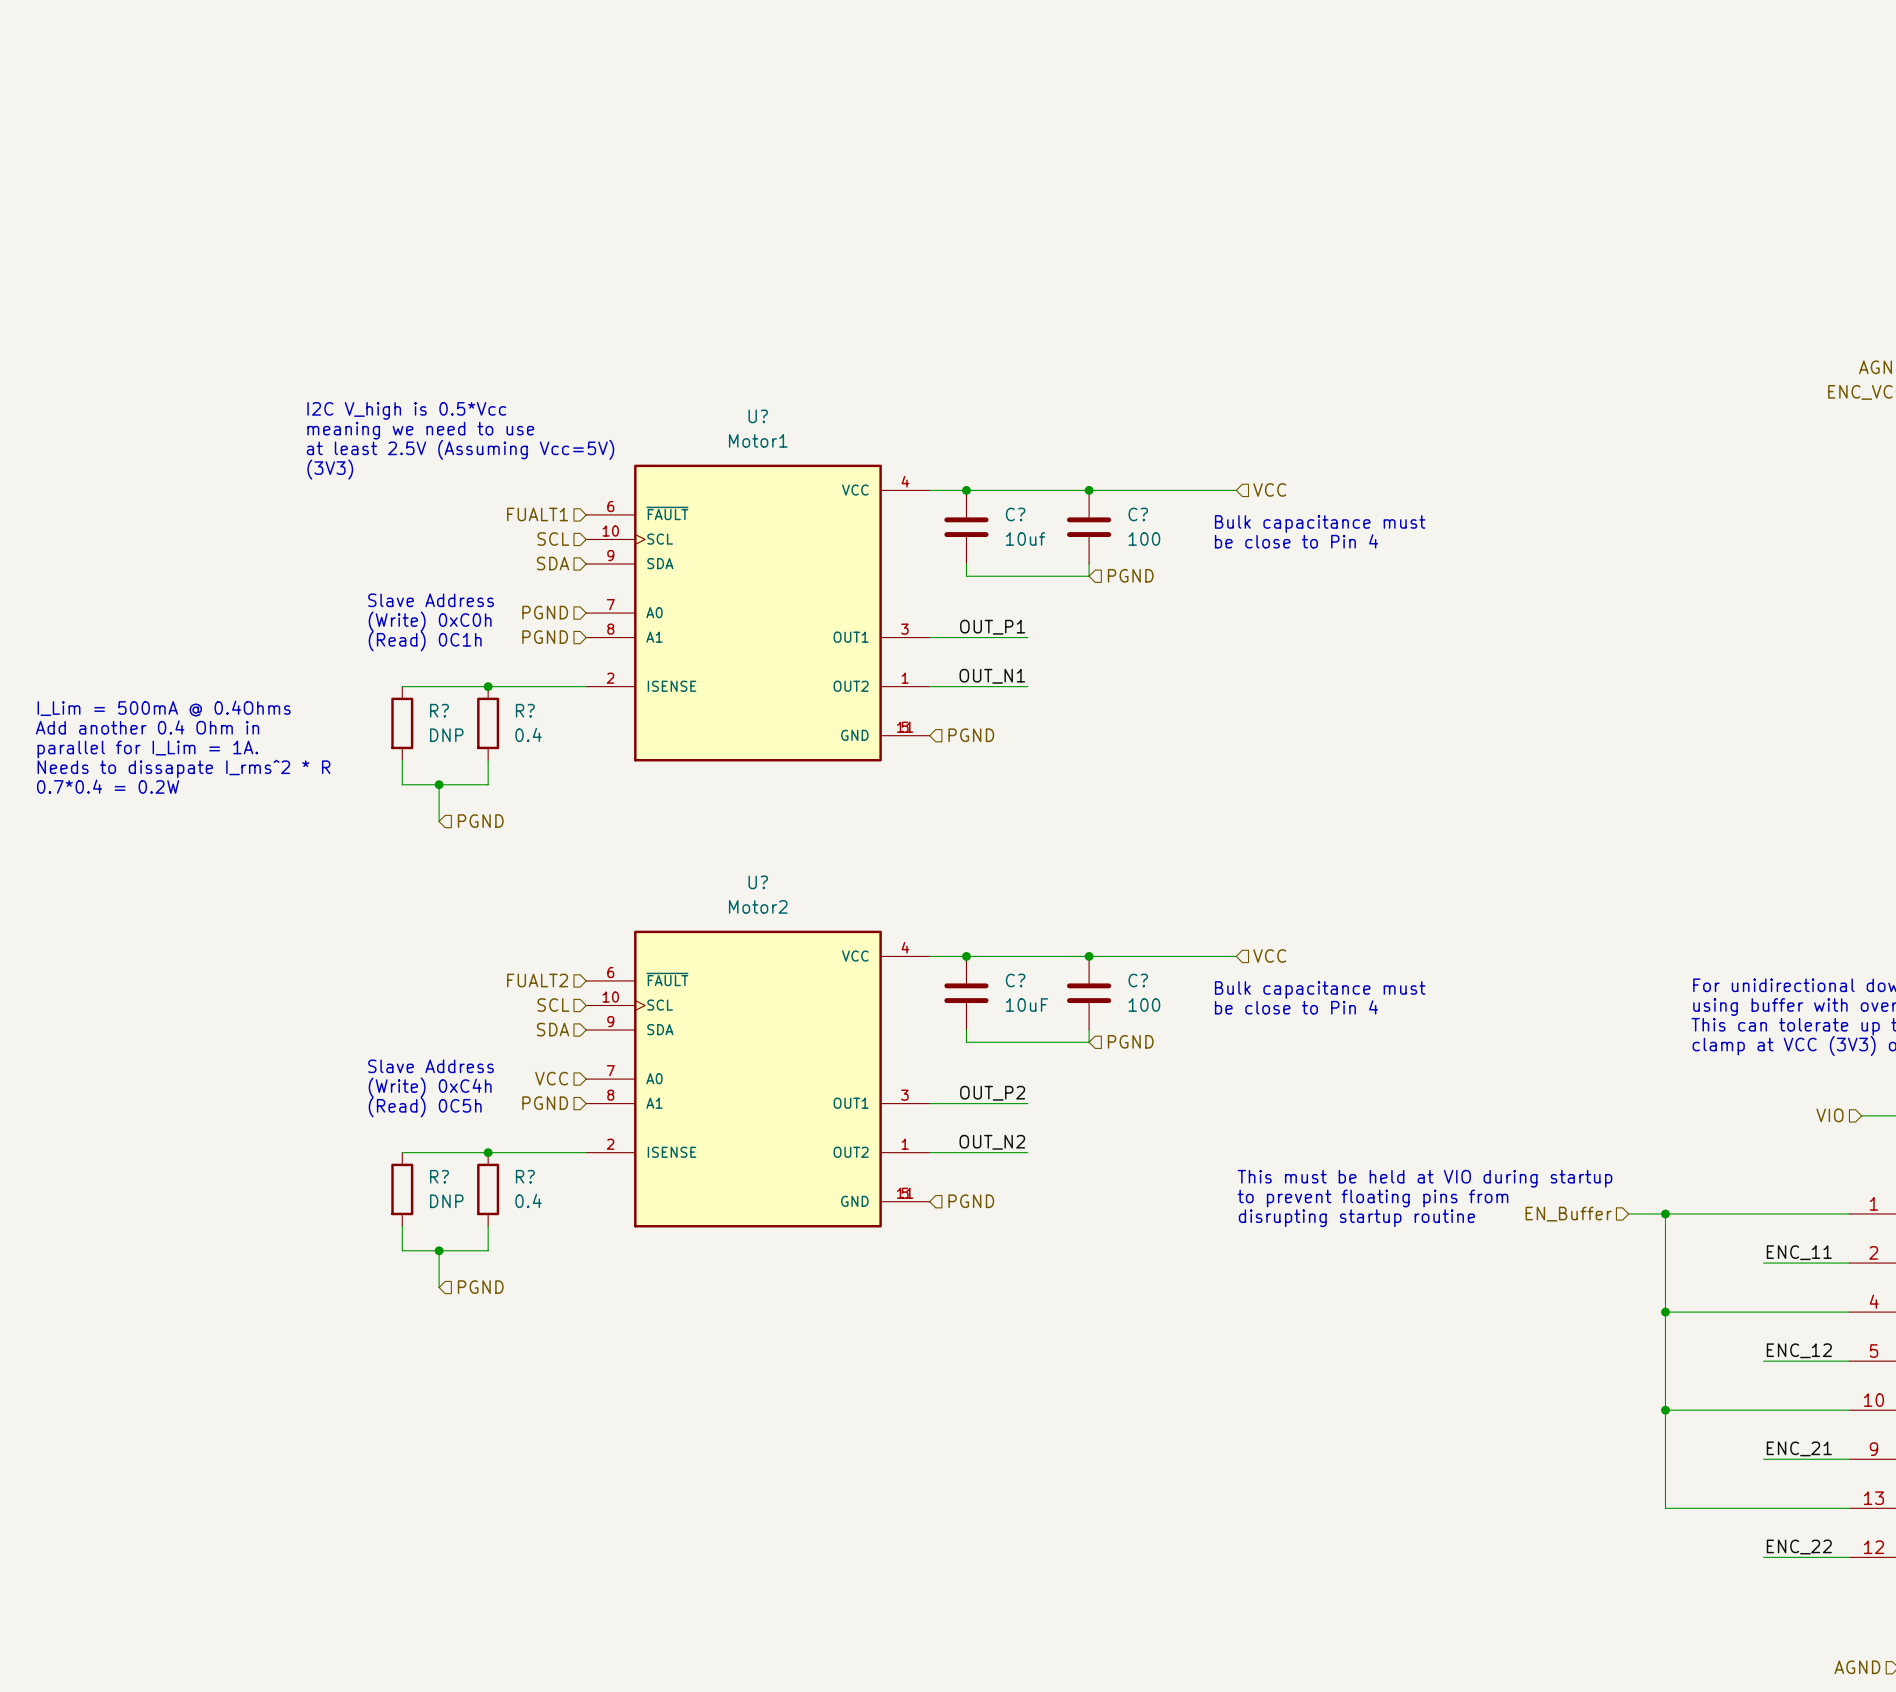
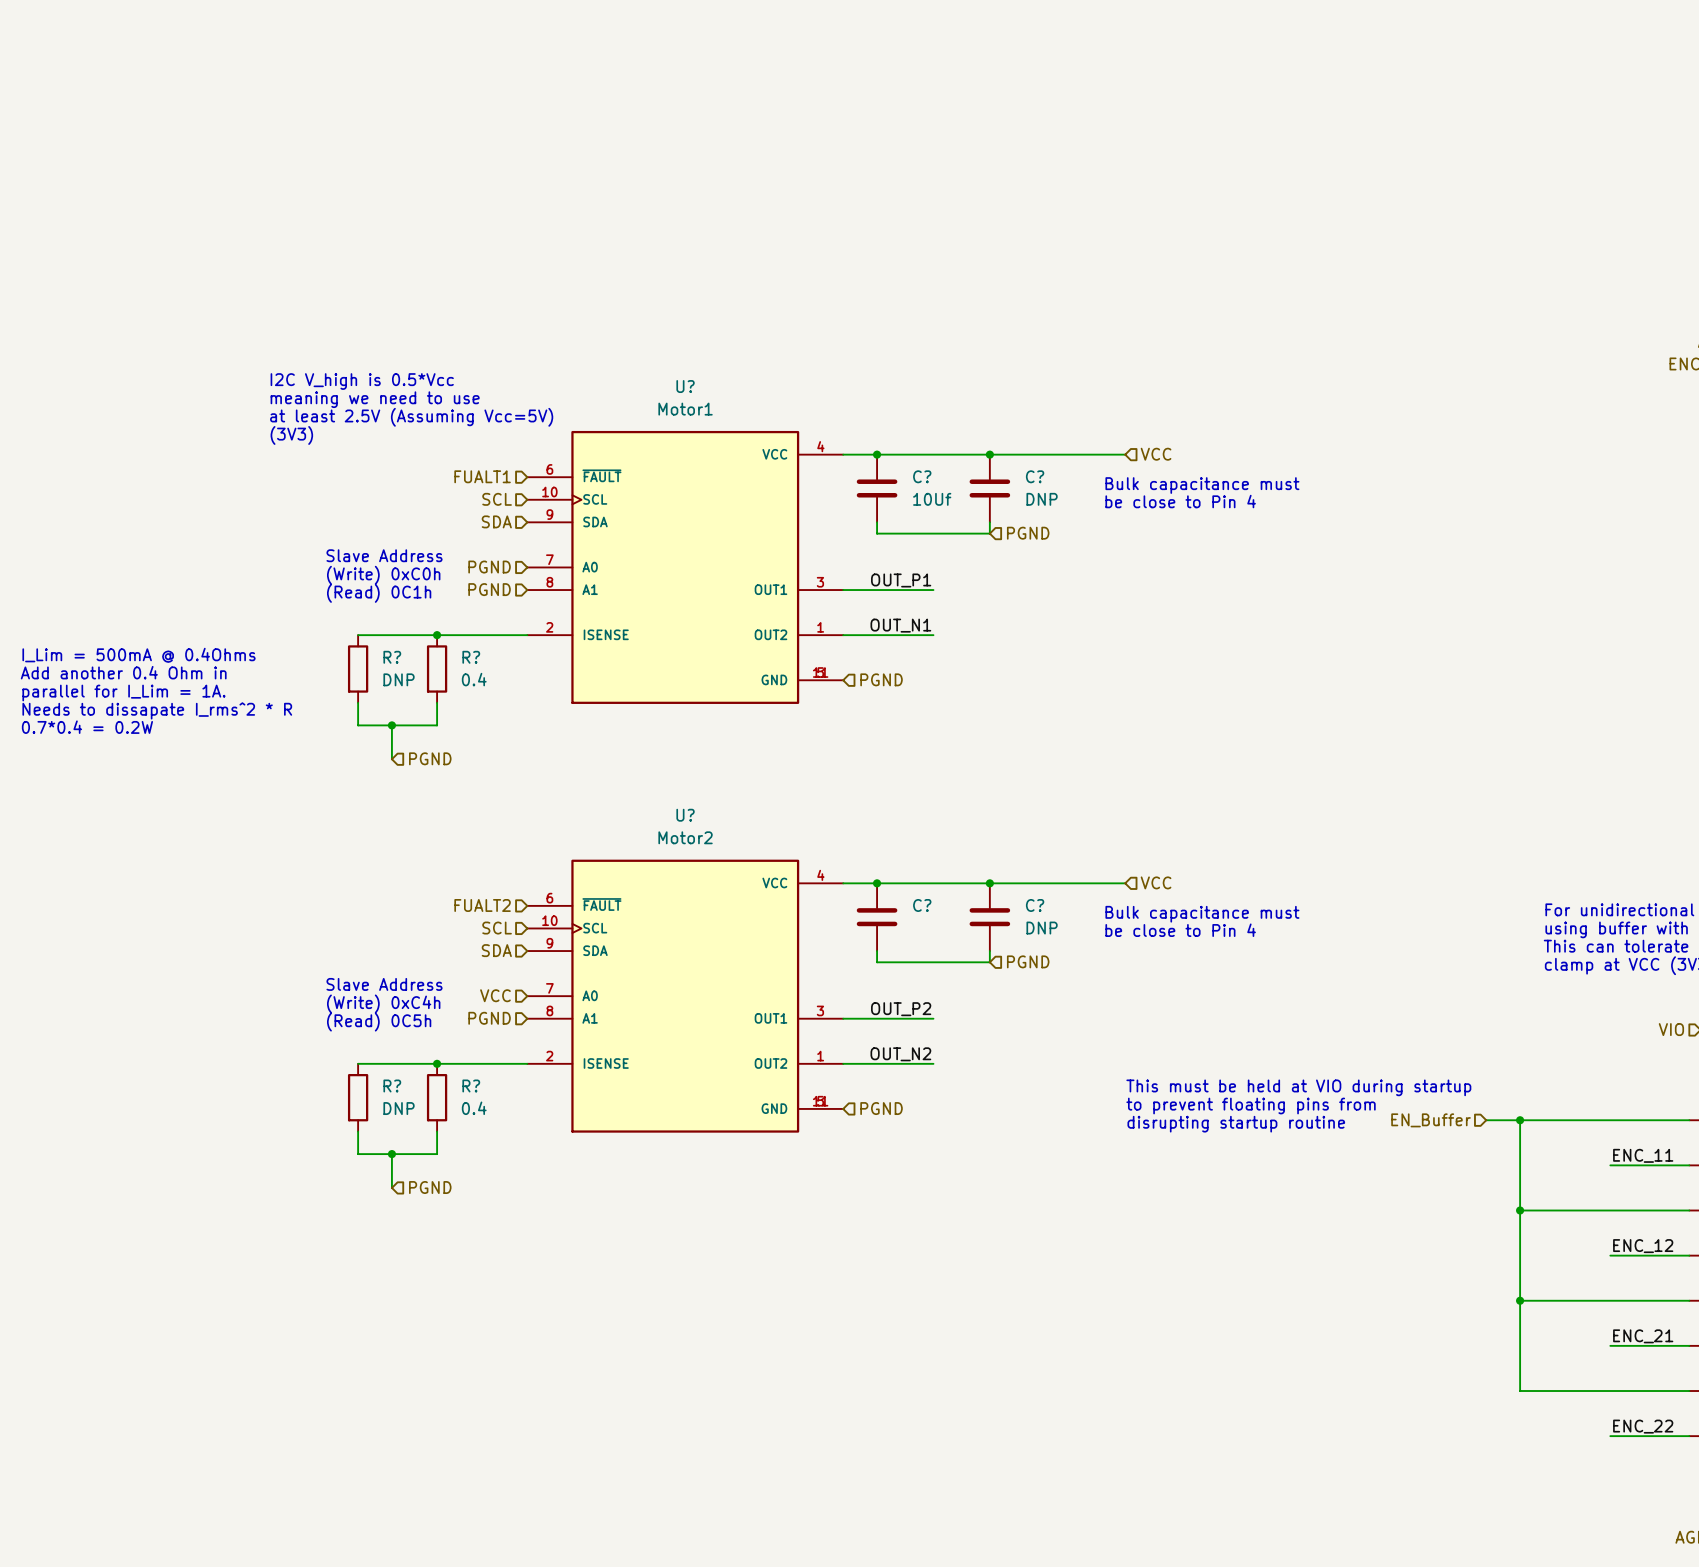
C? value: 10uf (1025, 539) -> 10Uf (932, 499)
C? value: 100 (1144, 539) -> DNP (1042, 499)
C? value: 10uF (1026, 1005) -> none
C? value: 100 (1144, 1005) -> DNP (1042, 928)

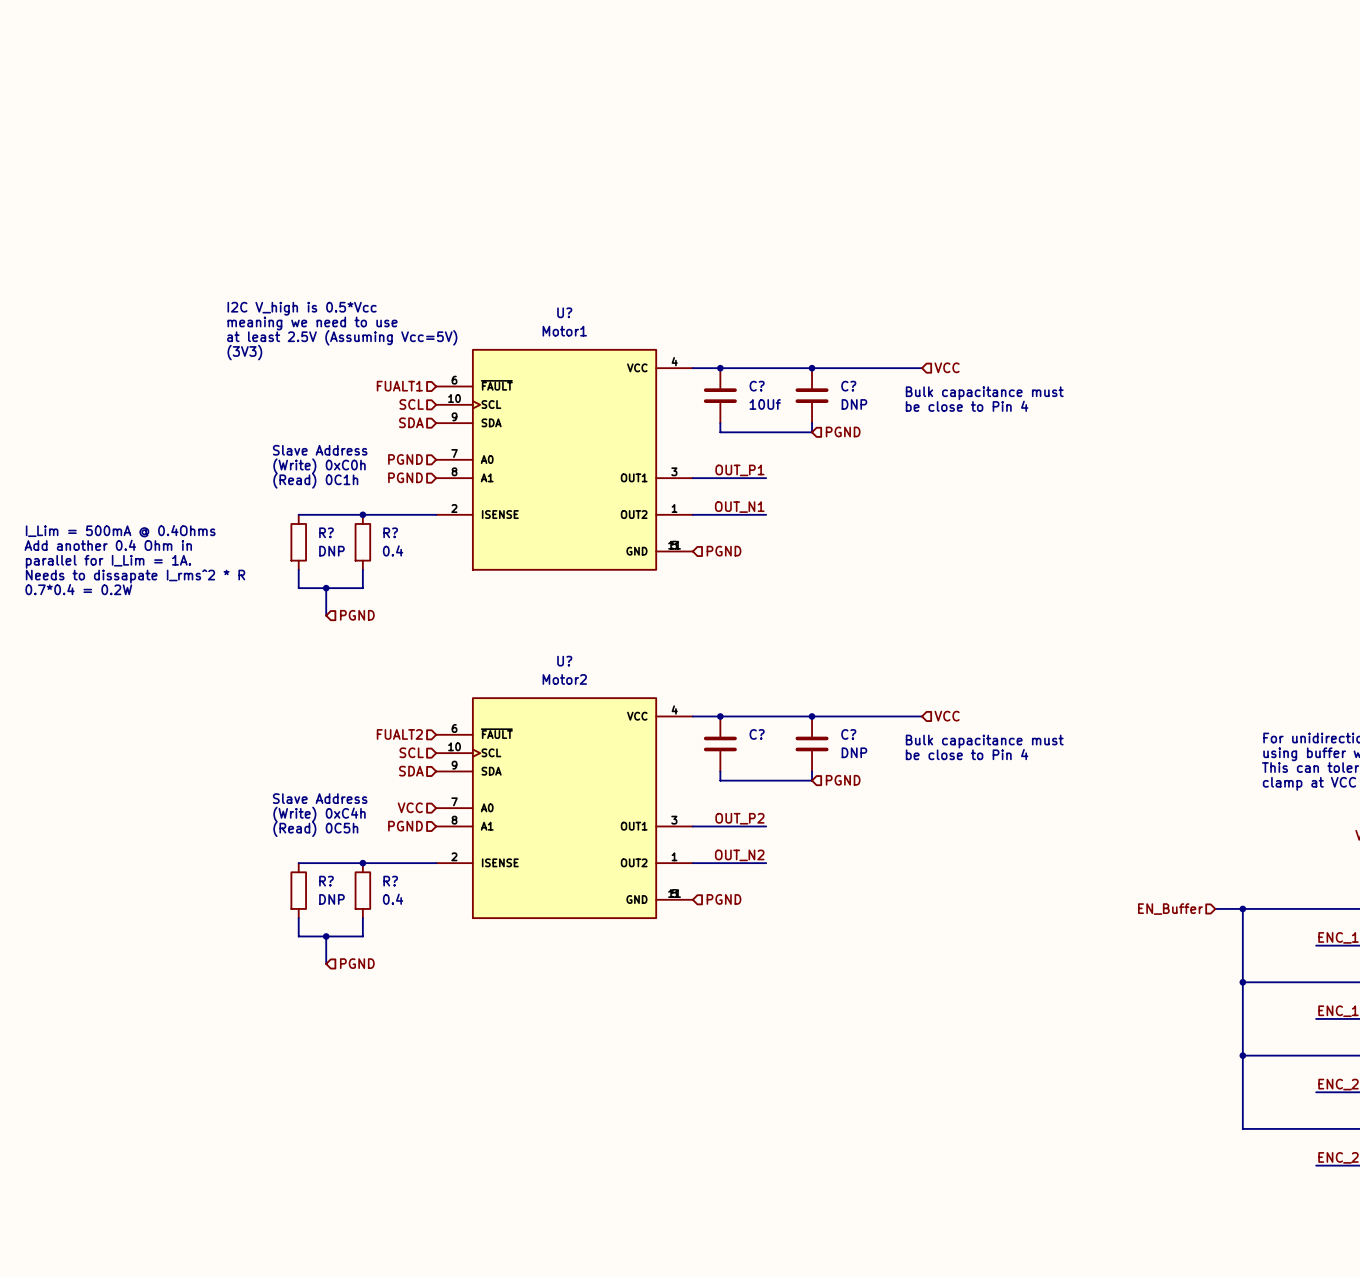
text: This must be held at VIO during startup (1298, 1087) -> none
text: to prevent floating pins from (1251, 1106) -> none
text: disrupting startup routine (1236, 1124) -> none

